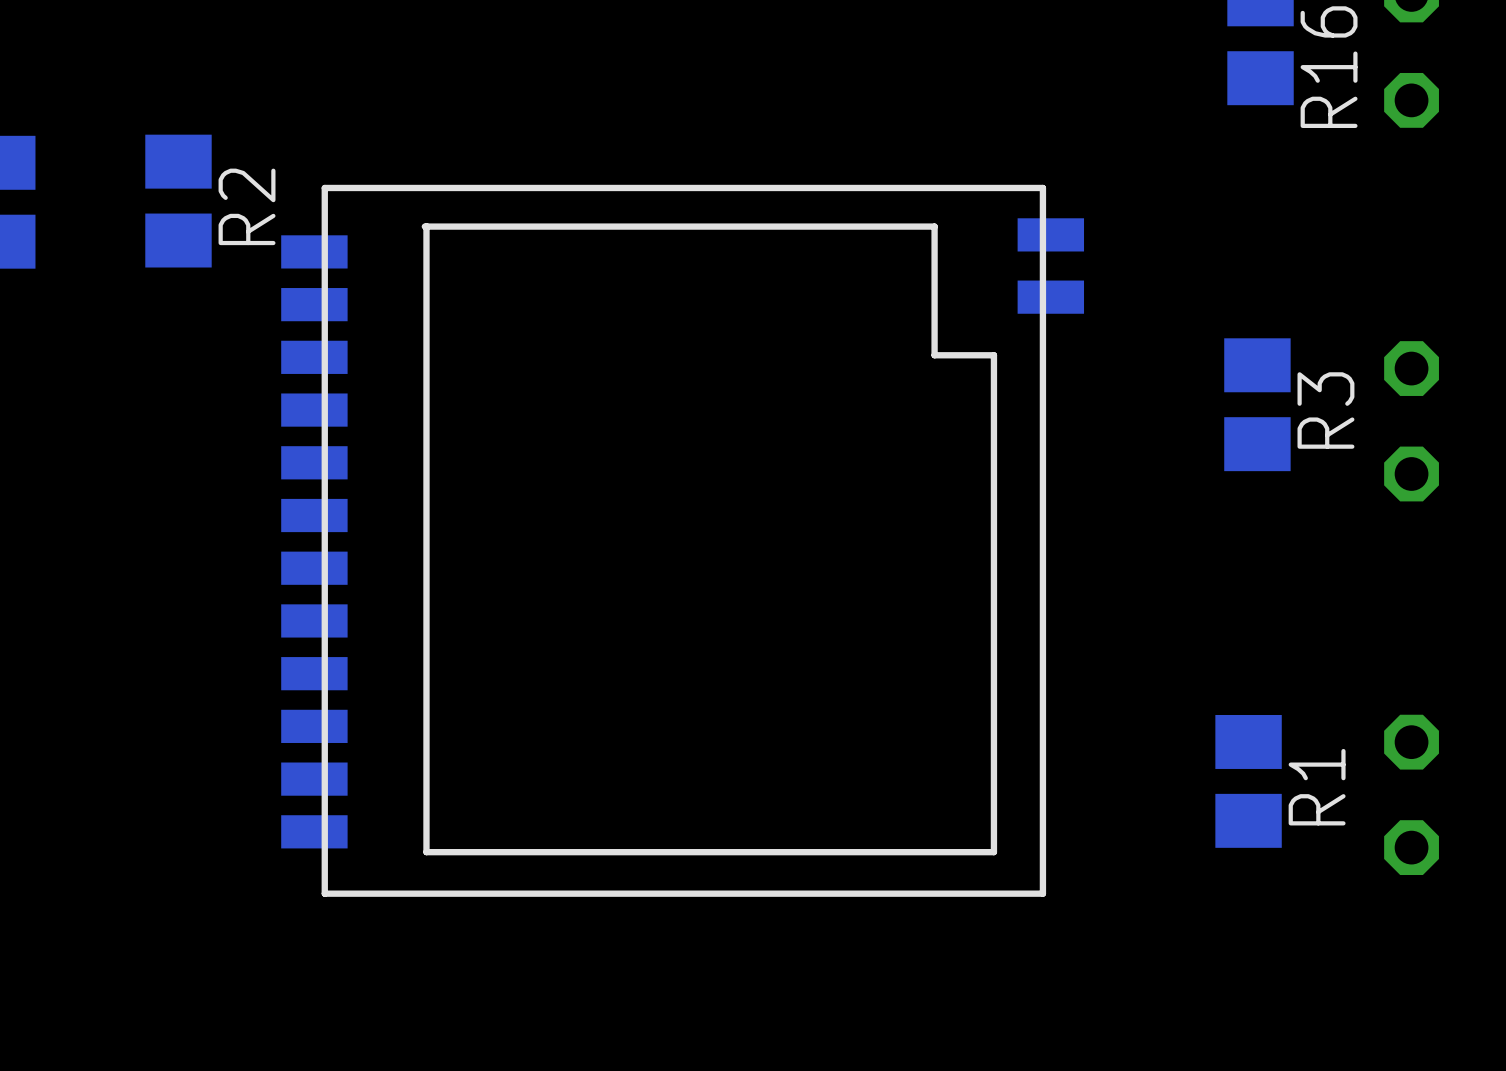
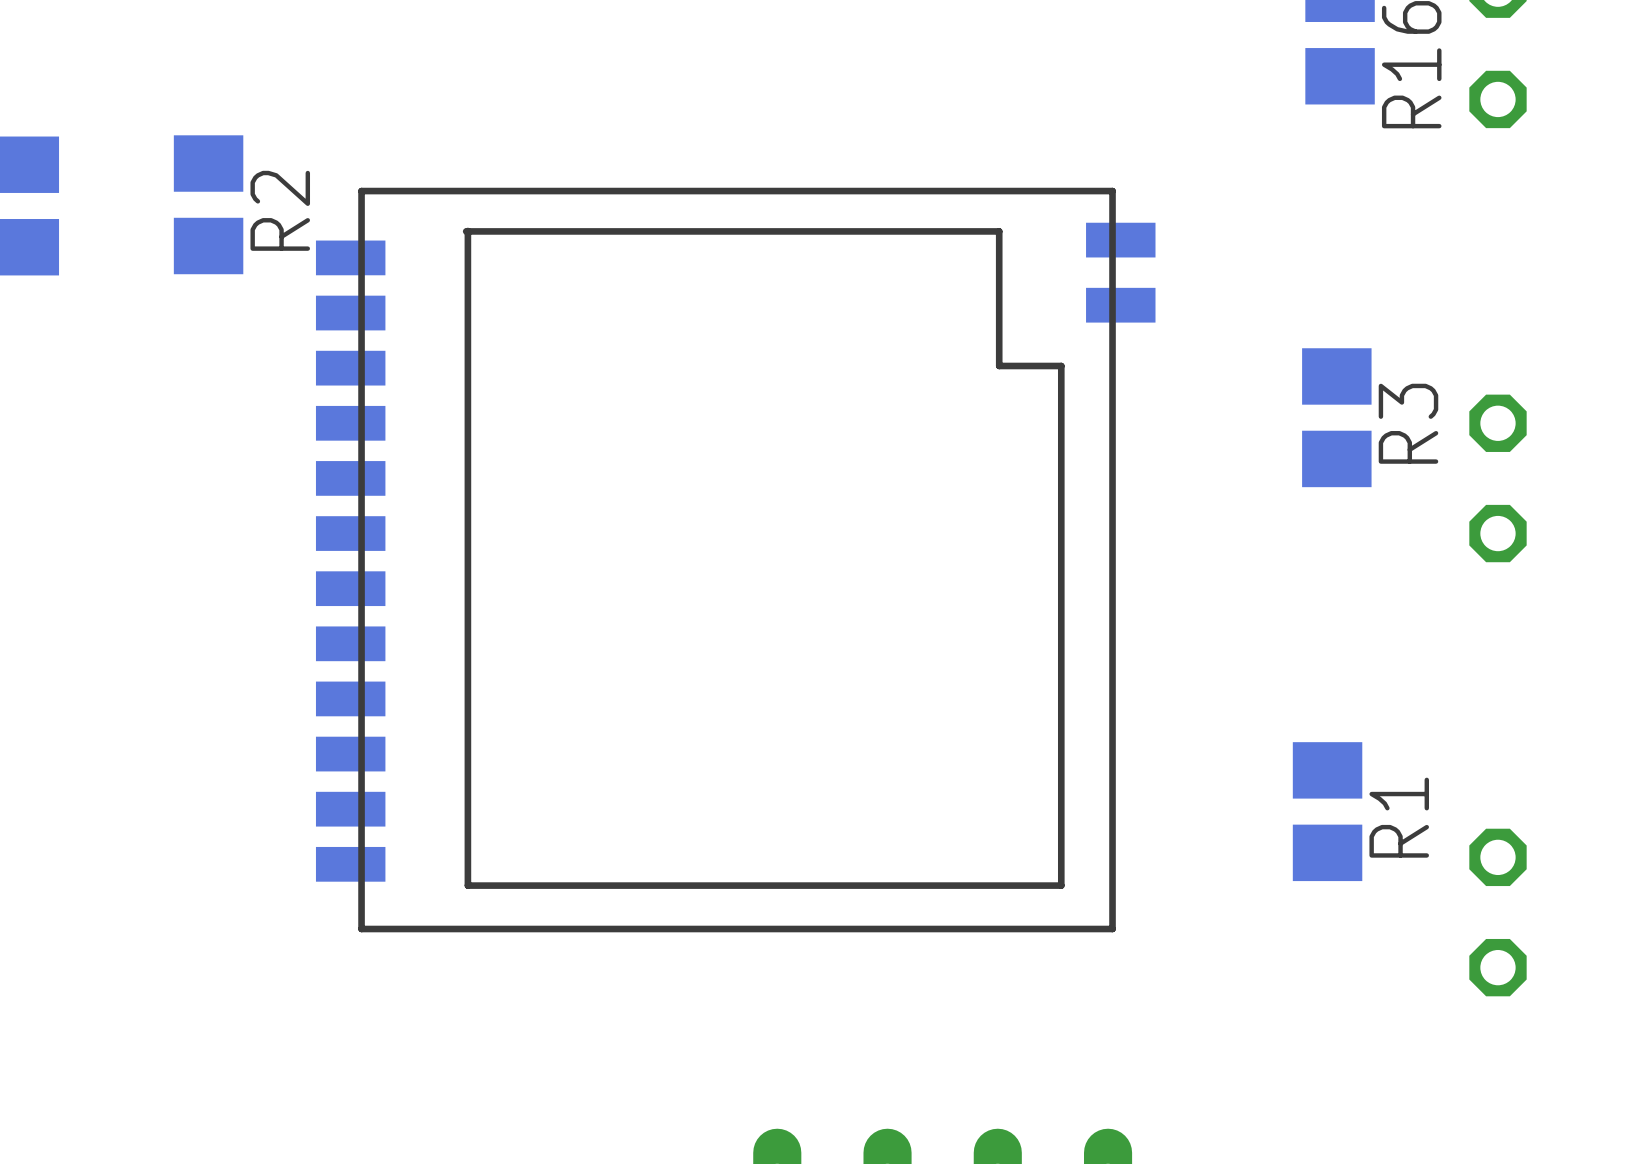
part position: (1411, 421) -> (1497, 478)
part position: (1411, 794) -> (1497, 912)

